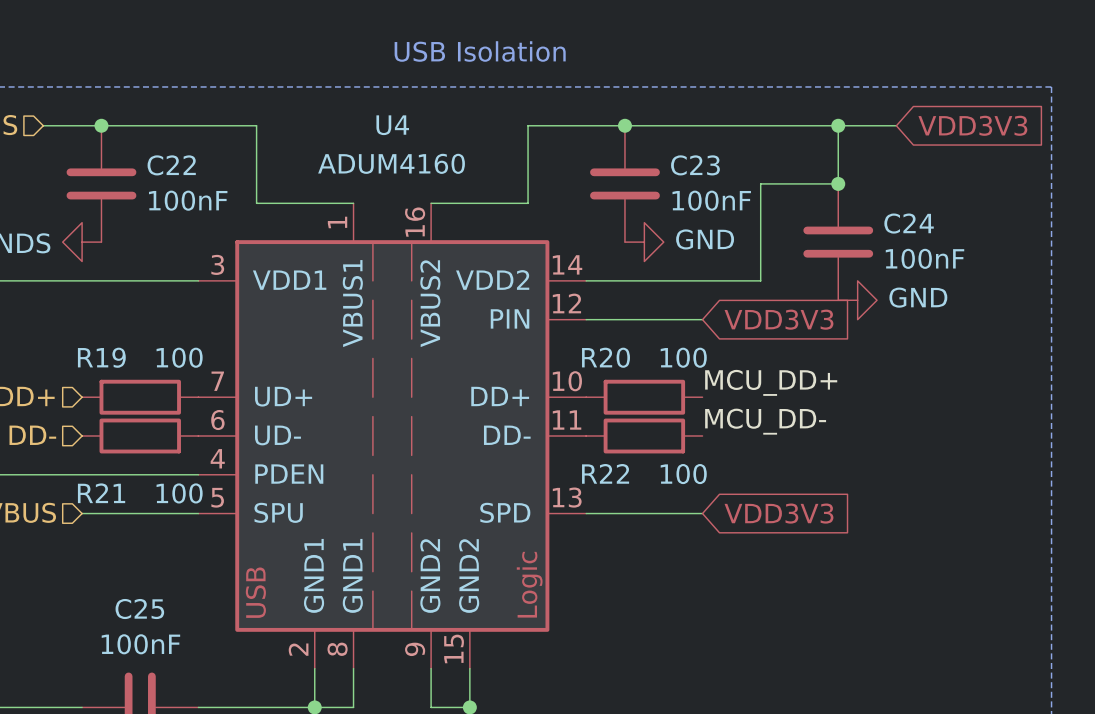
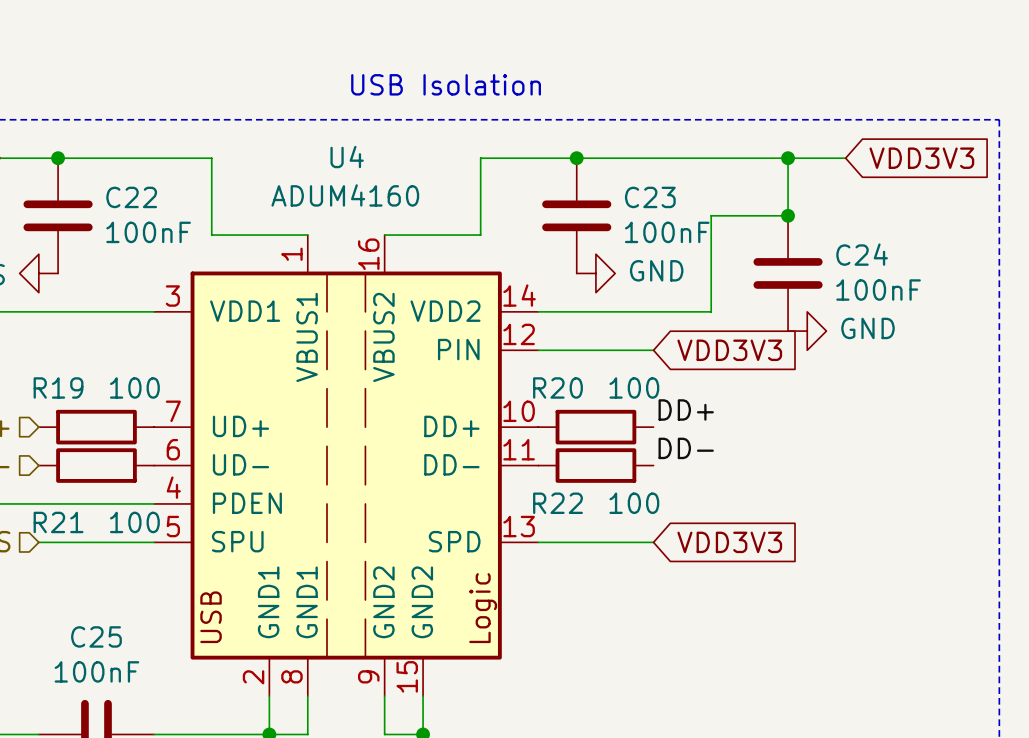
label: MCU_DD+ (771, 382) -> DD+ (686, 409)
label: MCU_DD- (765, 421) -> DD- (686, 448)

